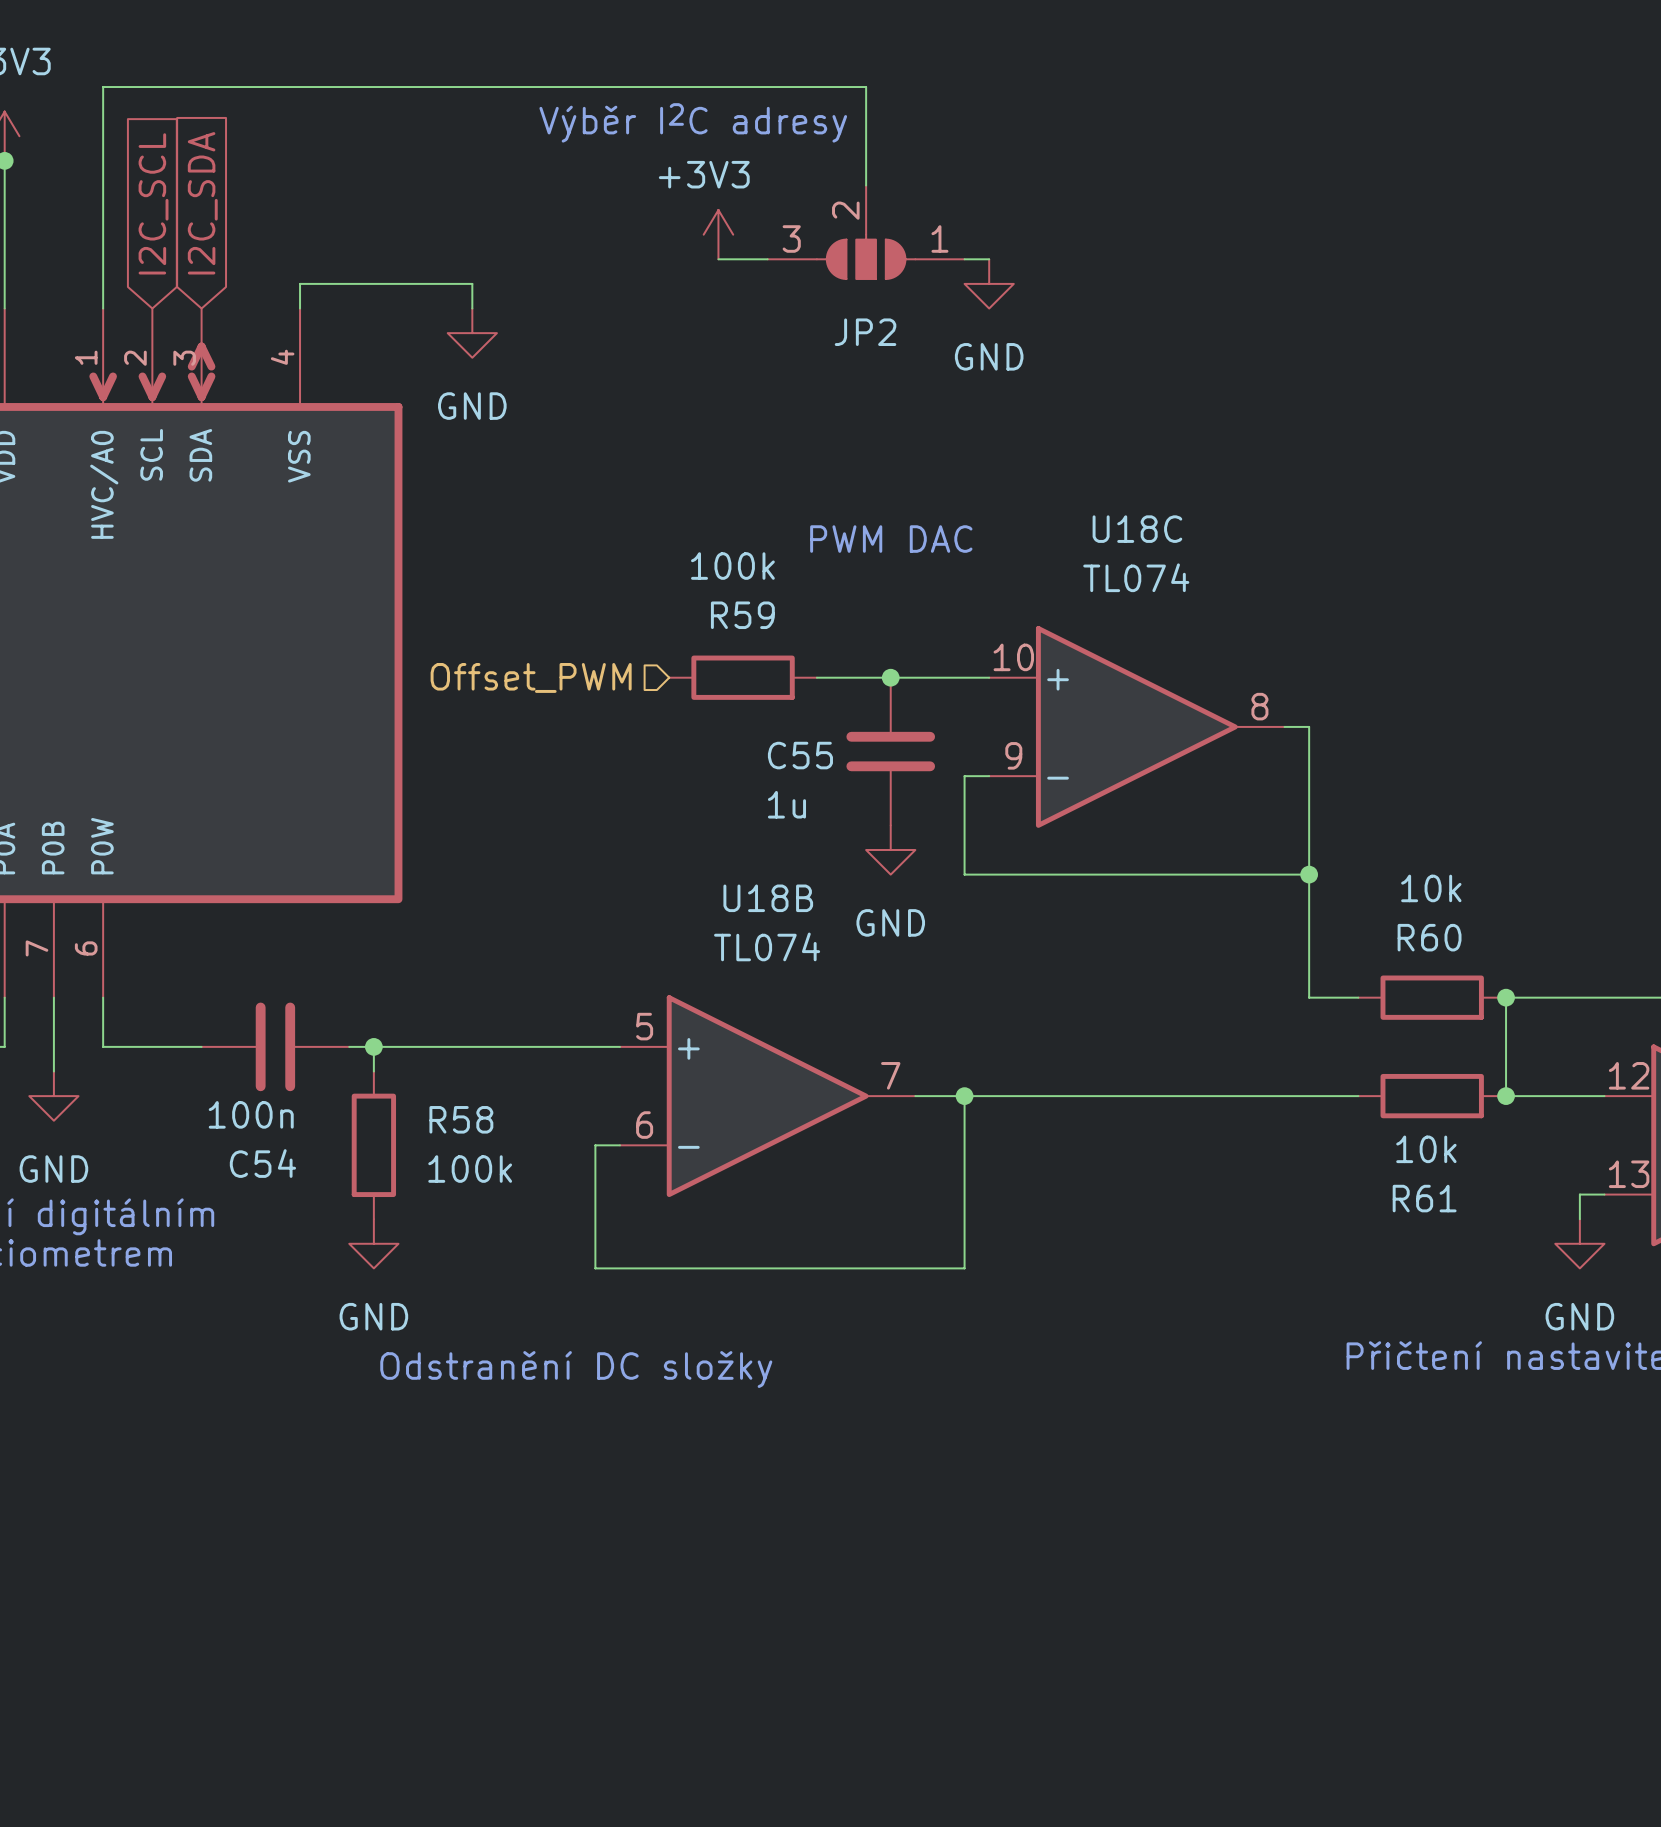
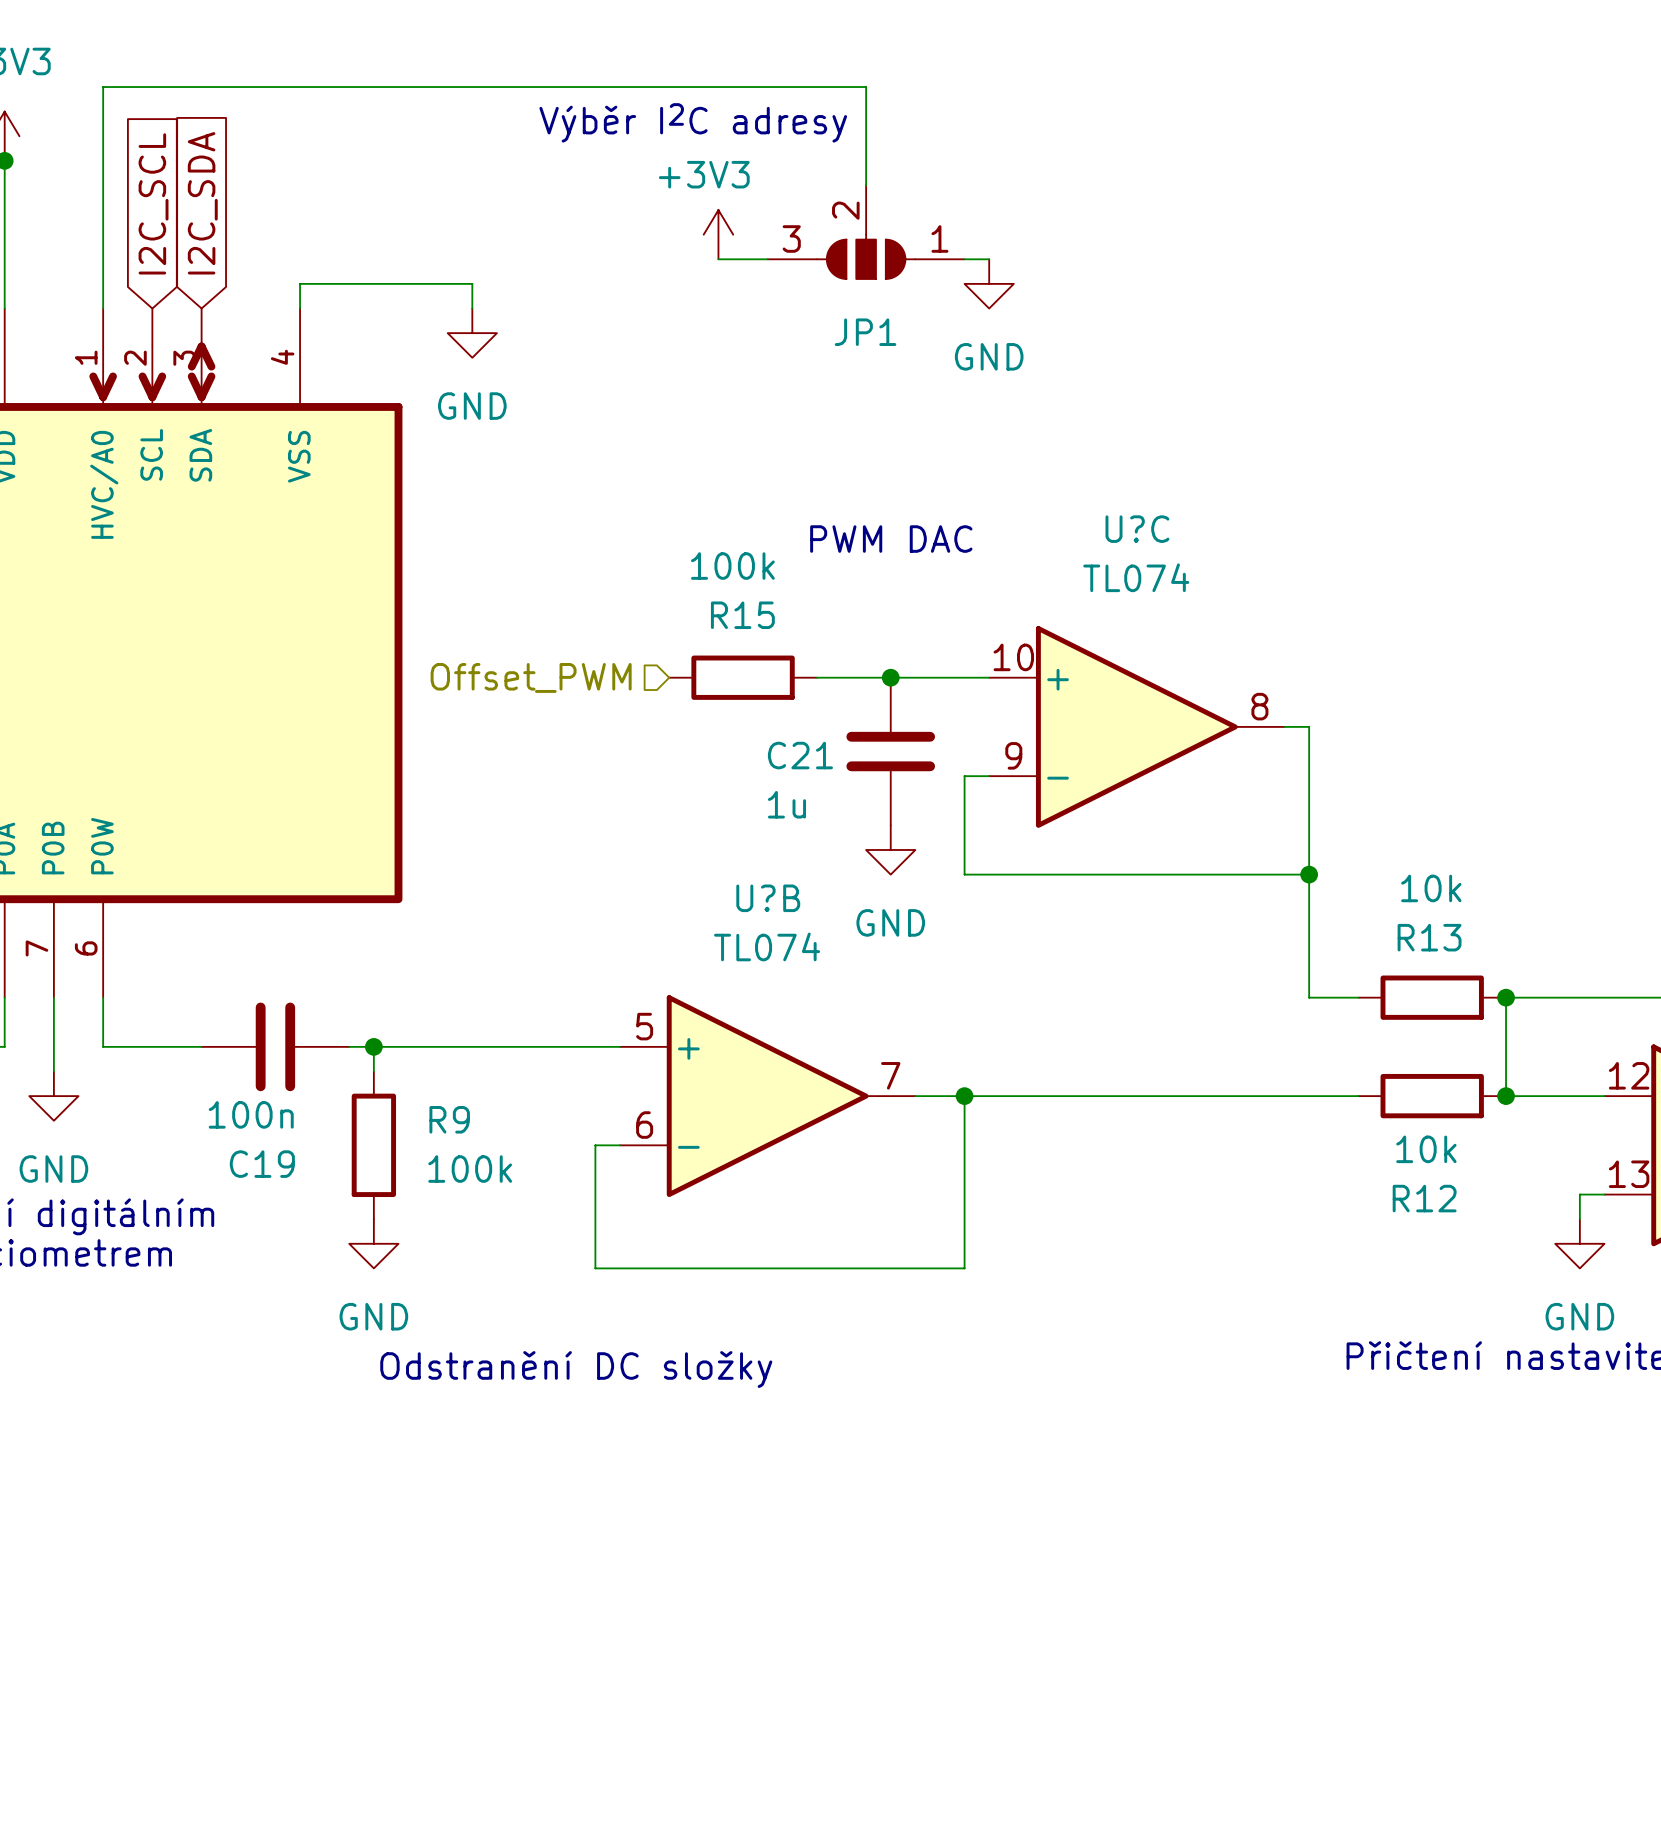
JP2 name: JP2 (865, 332) -> JP1 (865, 332)
U18C name: U18C (1137, 529) -> U?C (1137, 529)
R59 name: R59 (742, 615) -> R15 (742, 615)
C55 name: C55 (800, 755) -> C21 (800, 755)
U18B name: U18B (768, 898) -> U?B (768, 898)
R60 name: R60 (1429, 937) -> R13 (1429, 937)
R58 name: R58 (461, 1119) -> R9 (449, 1119)
C54 name: C54 (262, 1163) -> C19 (262, 1164)
R61 name: R61 (1424, 1198) -> R12 (1424, 1198)

